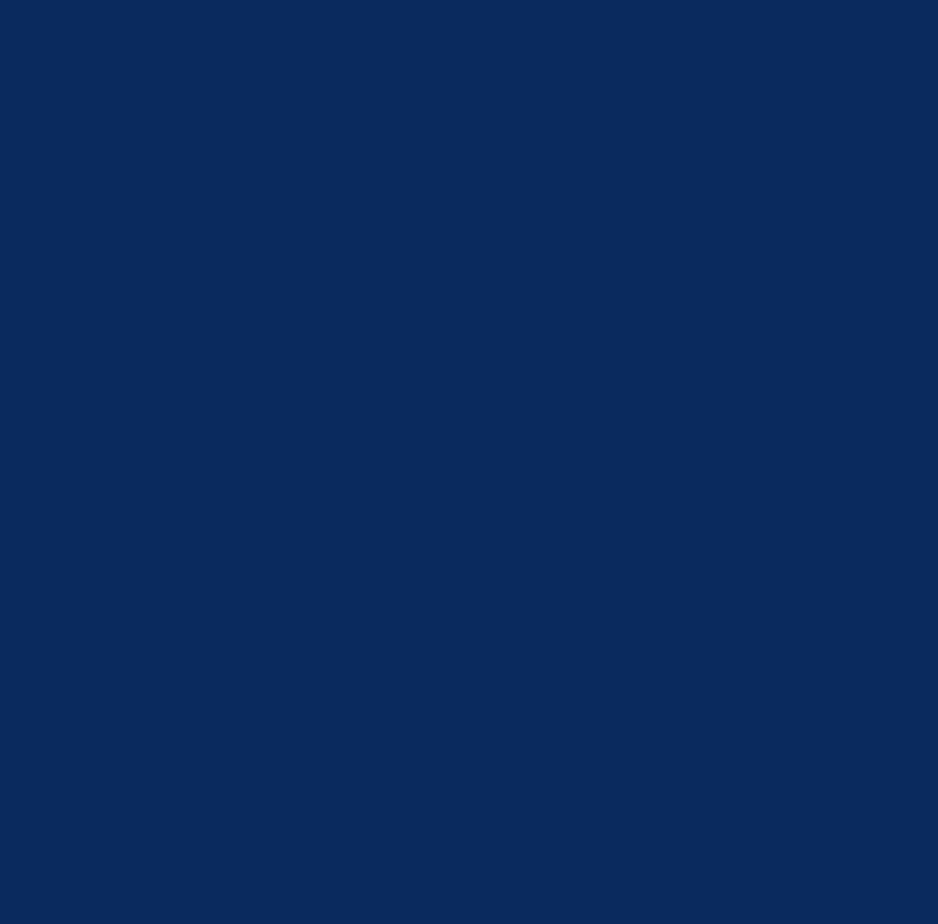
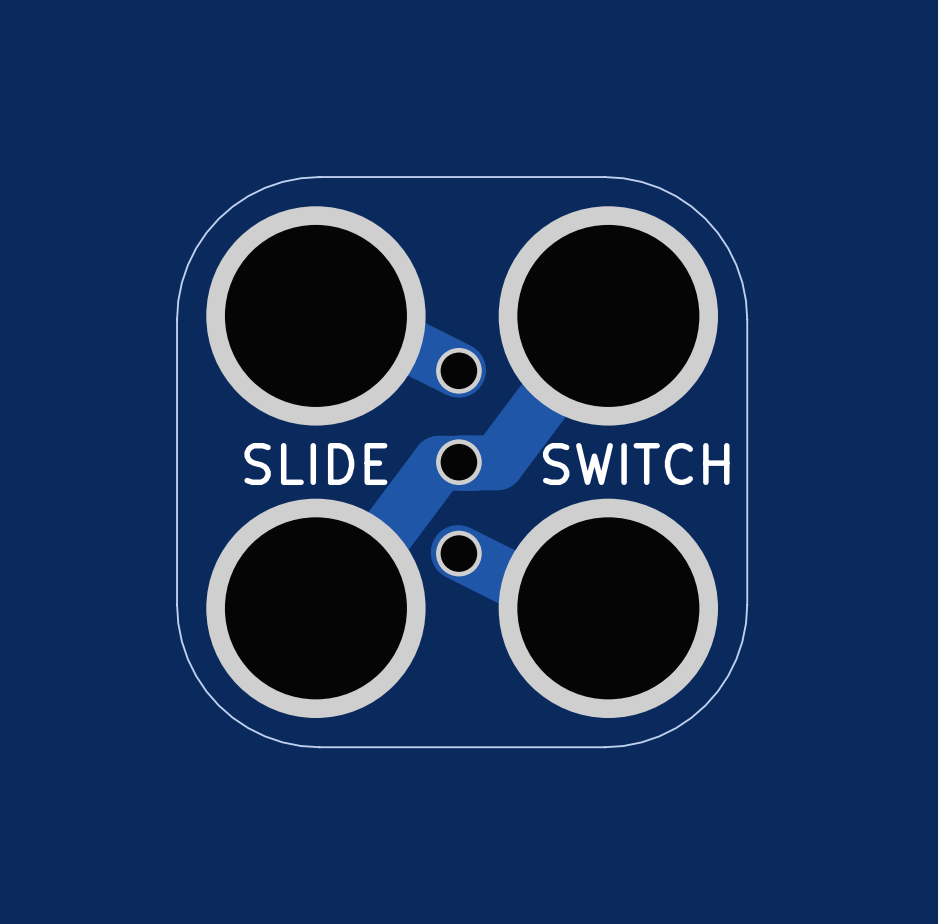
part: none -> (462, 462)

